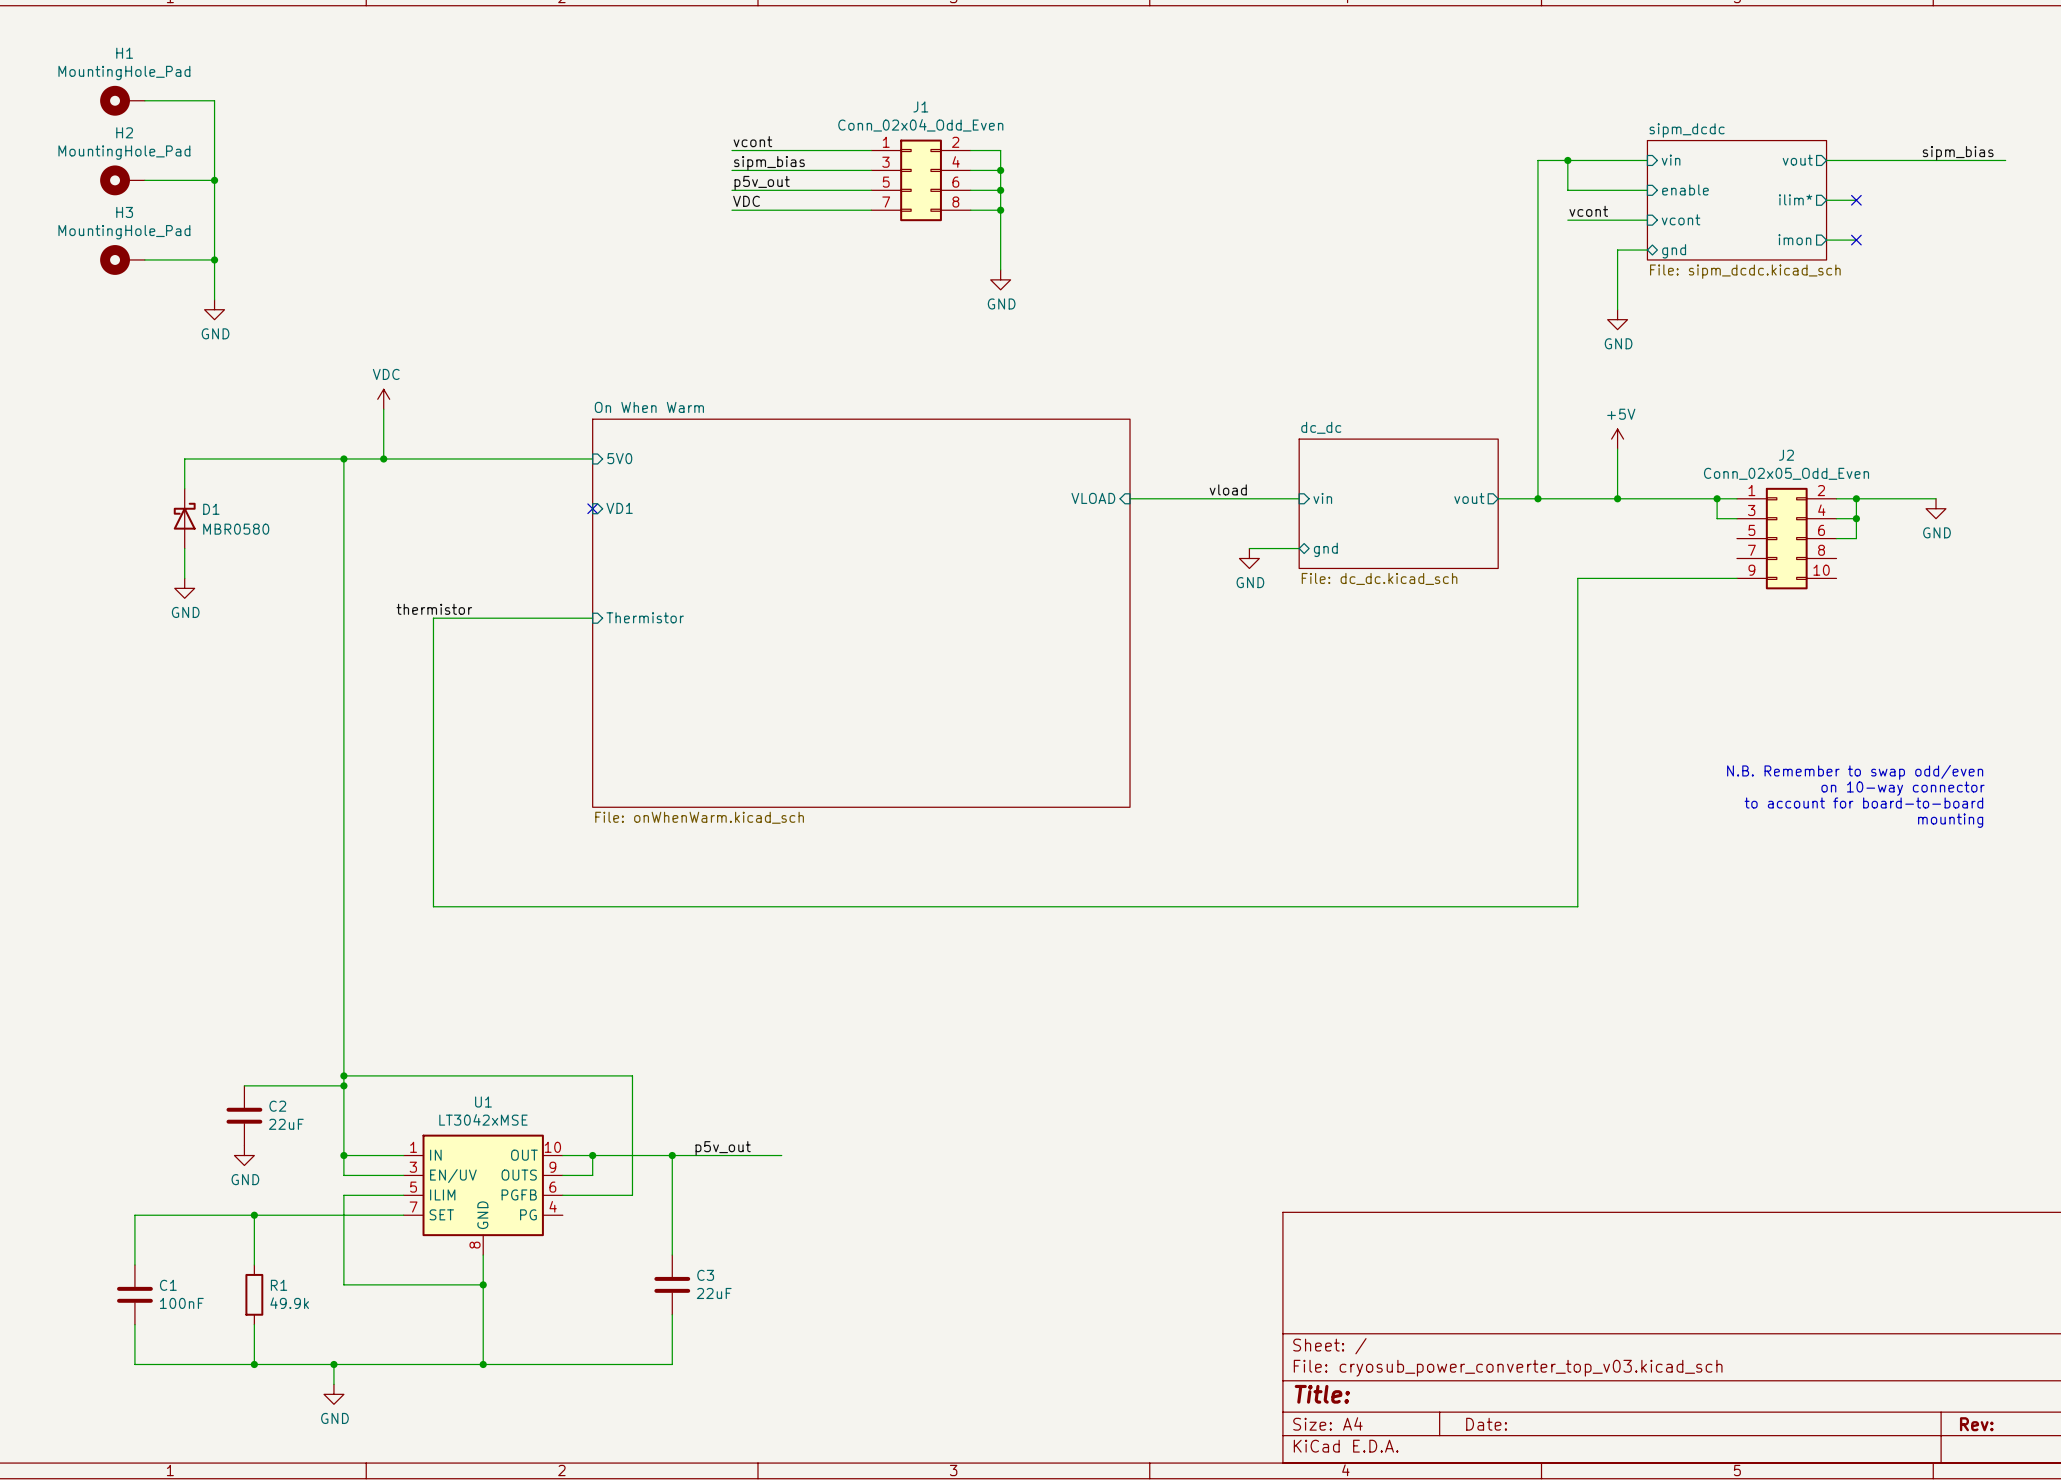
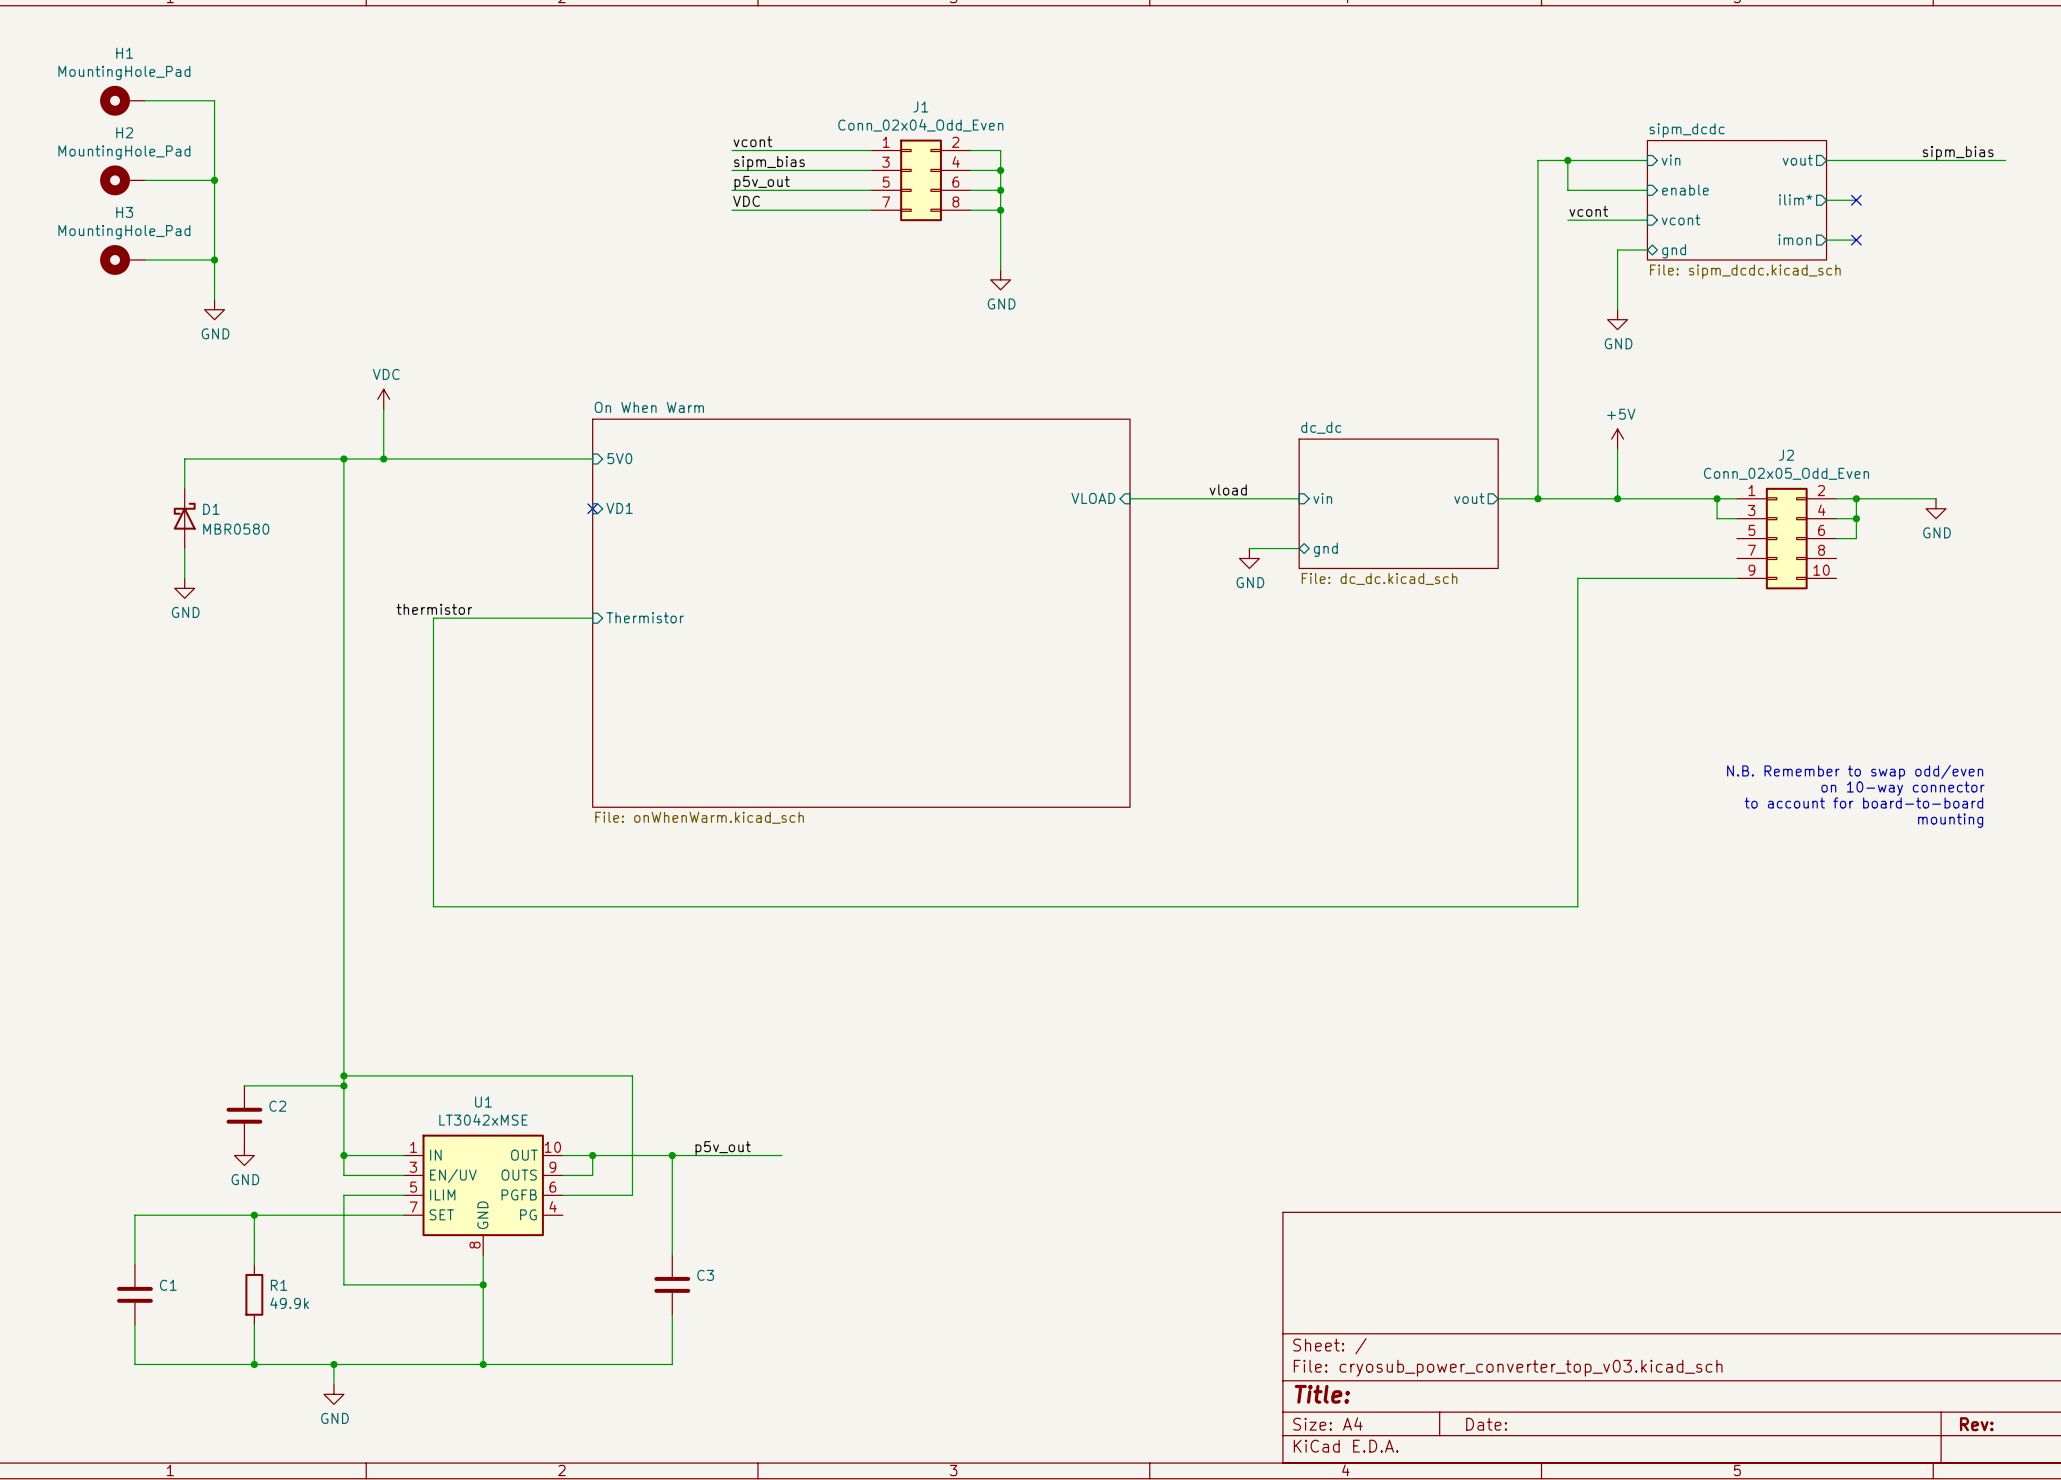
C2 value: 22uF (286, 1124) -> none
C3 value: 22uF (714, 1293) -> none
C1 value: 100nF (181, 1303) -> none

